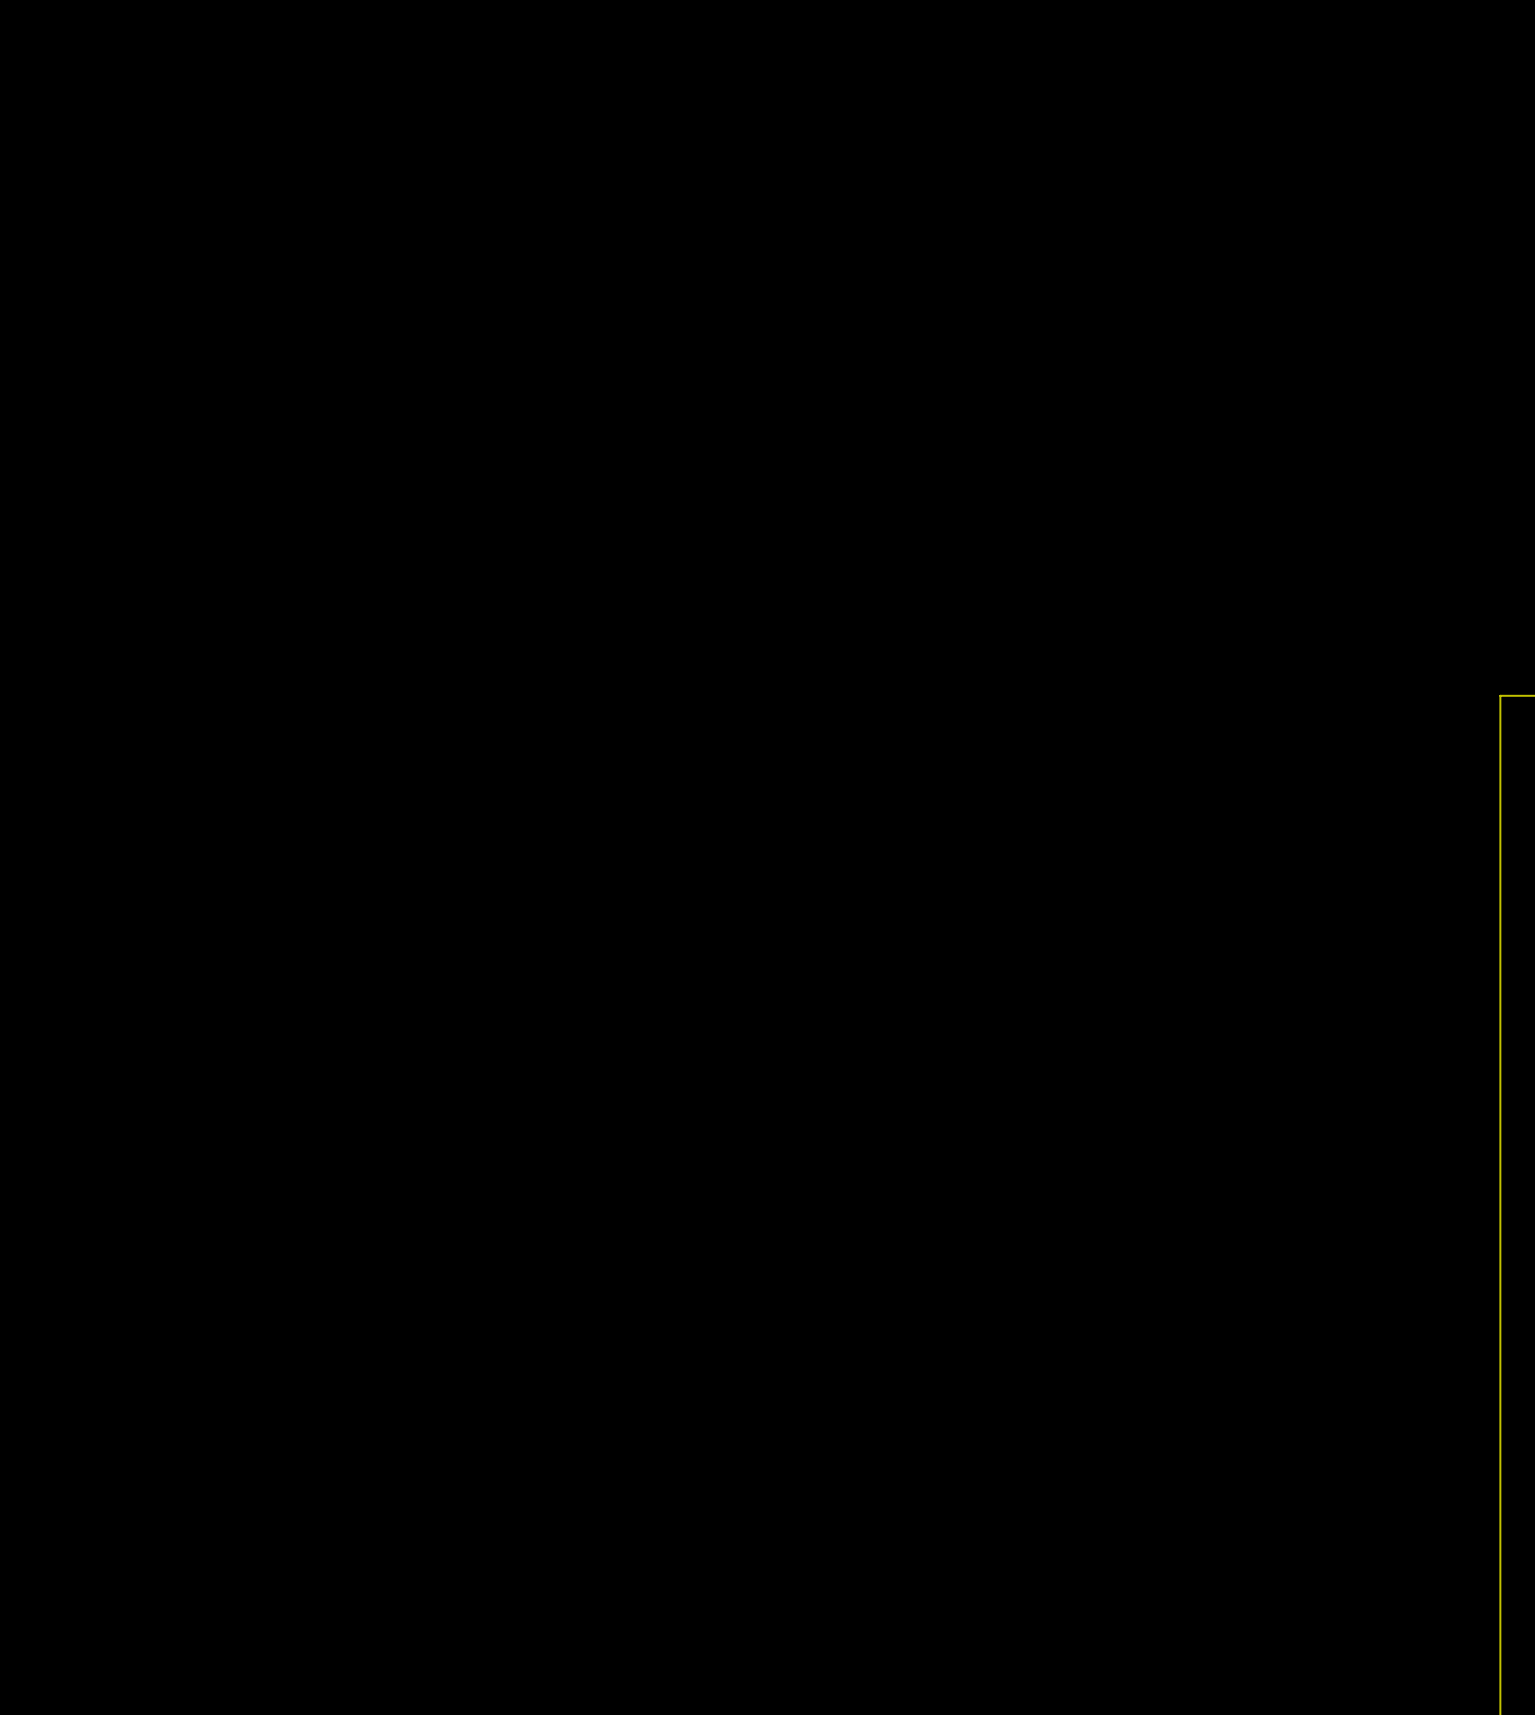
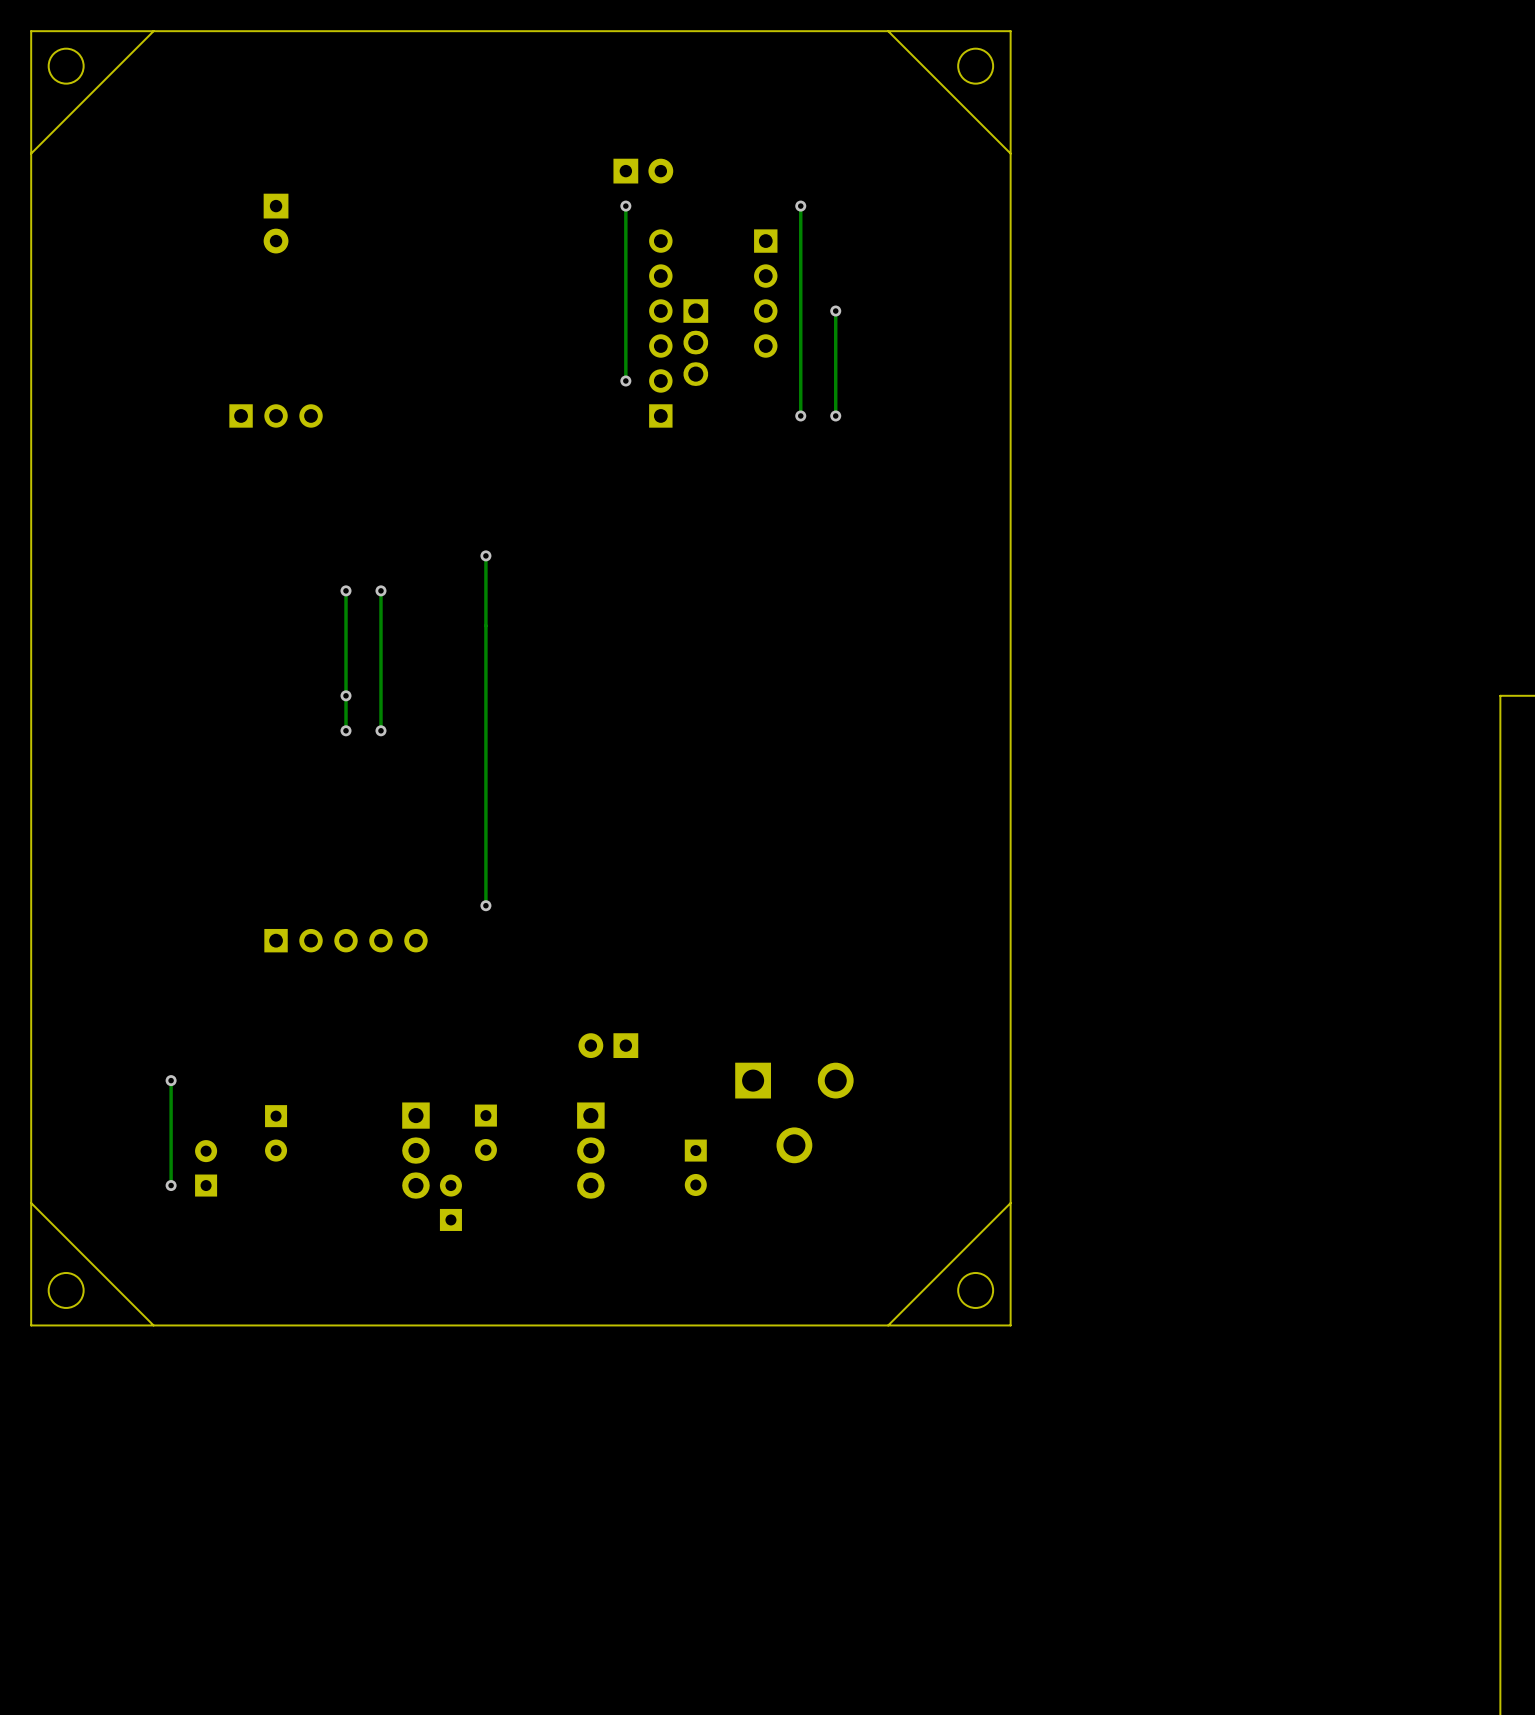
board edge: none -> (153, 31) (31, 153)
board edge: none -> (888, 31) (1010, 153)
board edge: none -> (1010, 31) (1010, 1325) (31, 1325) (31, 31) (1010, 31)
round board edge: none -> [47, 47, 85, 85]
round board edge: none -> [957, 47, 994, 85]
part: none -> (643, 171)
track: none -> (625, 206) (625, 380)
via: none -> (625, 206)
track: none -> (800, 206) (800, 415)
via: none -> (800, 206)
part: none -> (276, 223)
part: none -> (765, 293)
track: none -> (835, 311) (835, 415)
via: none -> (835, 311)
part: none -> (660, 328)
part: none -> (695, 342)
via: none -> (625, 380)
part: none -> (276, 415)
via: none -> (800, 415)
via: none -> (835, 415)
track: none -> (485, 555) (485, 905)
via: none -> (485, 555)
track: none -> (346, 590) (346, 730)
via: none -> (346, 590)
track: none -> (380, 590) (380, 730)
via: none -> (380, 590)
via: none -> (346, 695)
via: none -> (346, 730)
via: none -> (380, 730)
via: none -> (485, 905)
part: none -> (346, 940)
part: none -> (608, 1045)
track: none -> (171, 1080) (171, 1185)
via: none -> (171, 1080)
part: none -> (794, 1112)
part: none -> (485, 1132)
part: none -> (276, 1133)
part: none -> (415, 1150)
part: none -> (590, 1150)
part: none -> (695, 1167)
part: none -> (206, 1168)
via: none -> (171, 1185)
part: none -> (450, 1202)
board edge: none -> (31, 1203) (153, 1325)
board edge: none -> (1010, 1203) (888, 1325)
round board edge: none -> [47, 1272, 85, 1309]
round board edge: none -> [957, 1272, 994, 1309]

